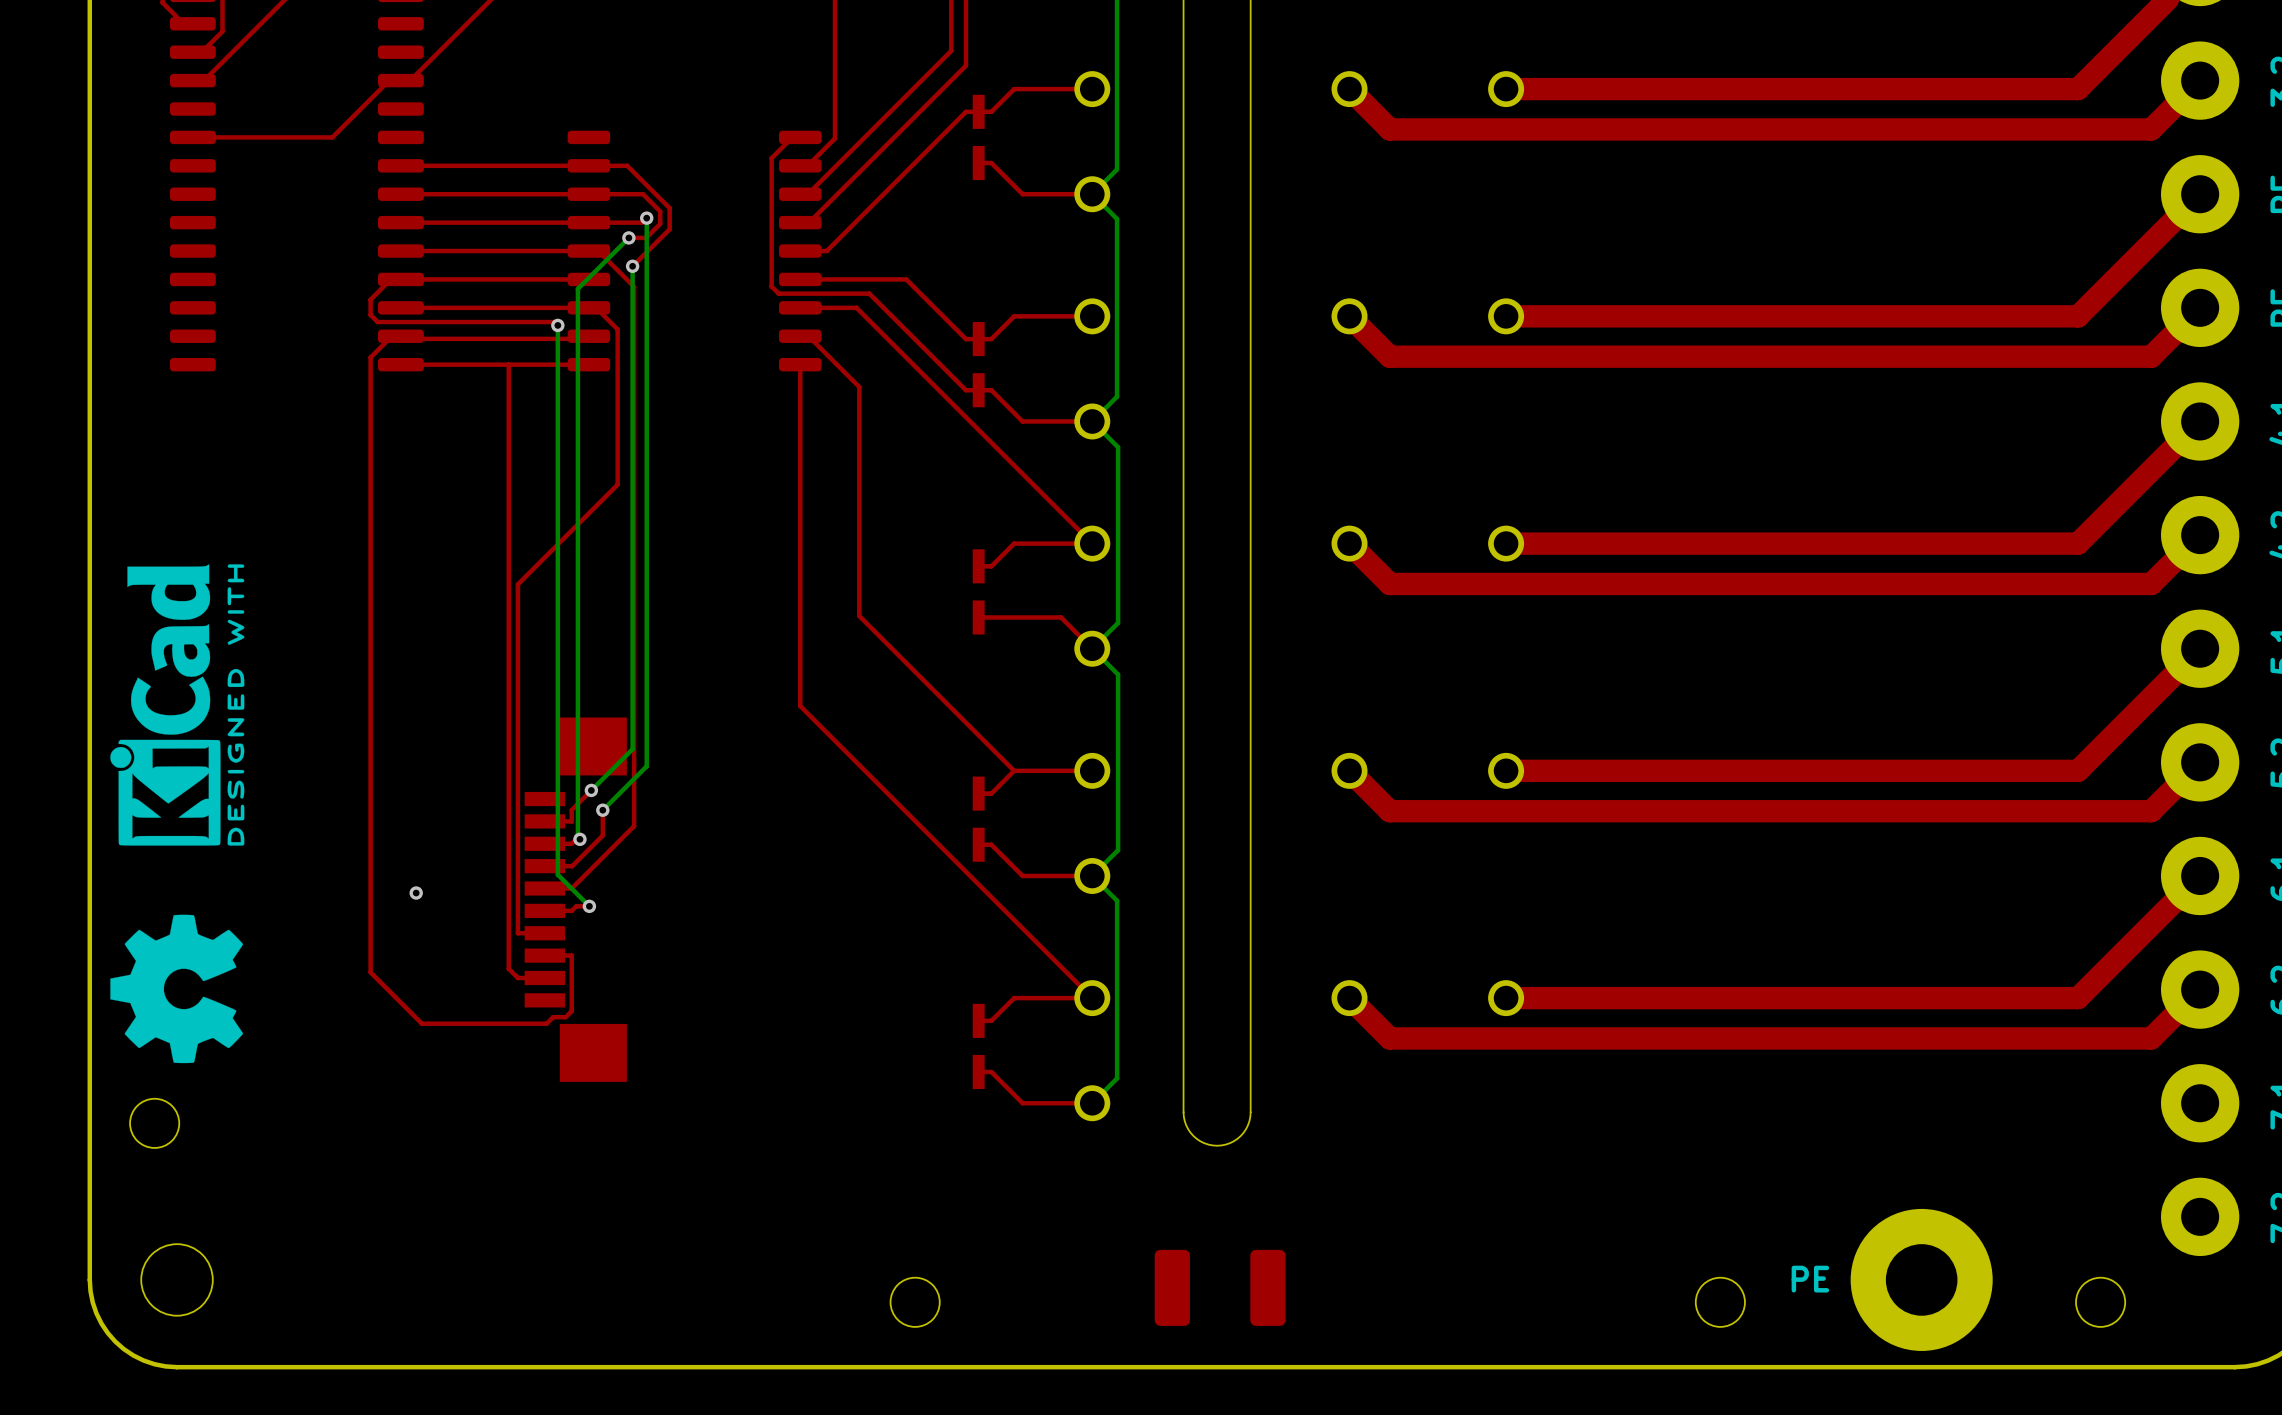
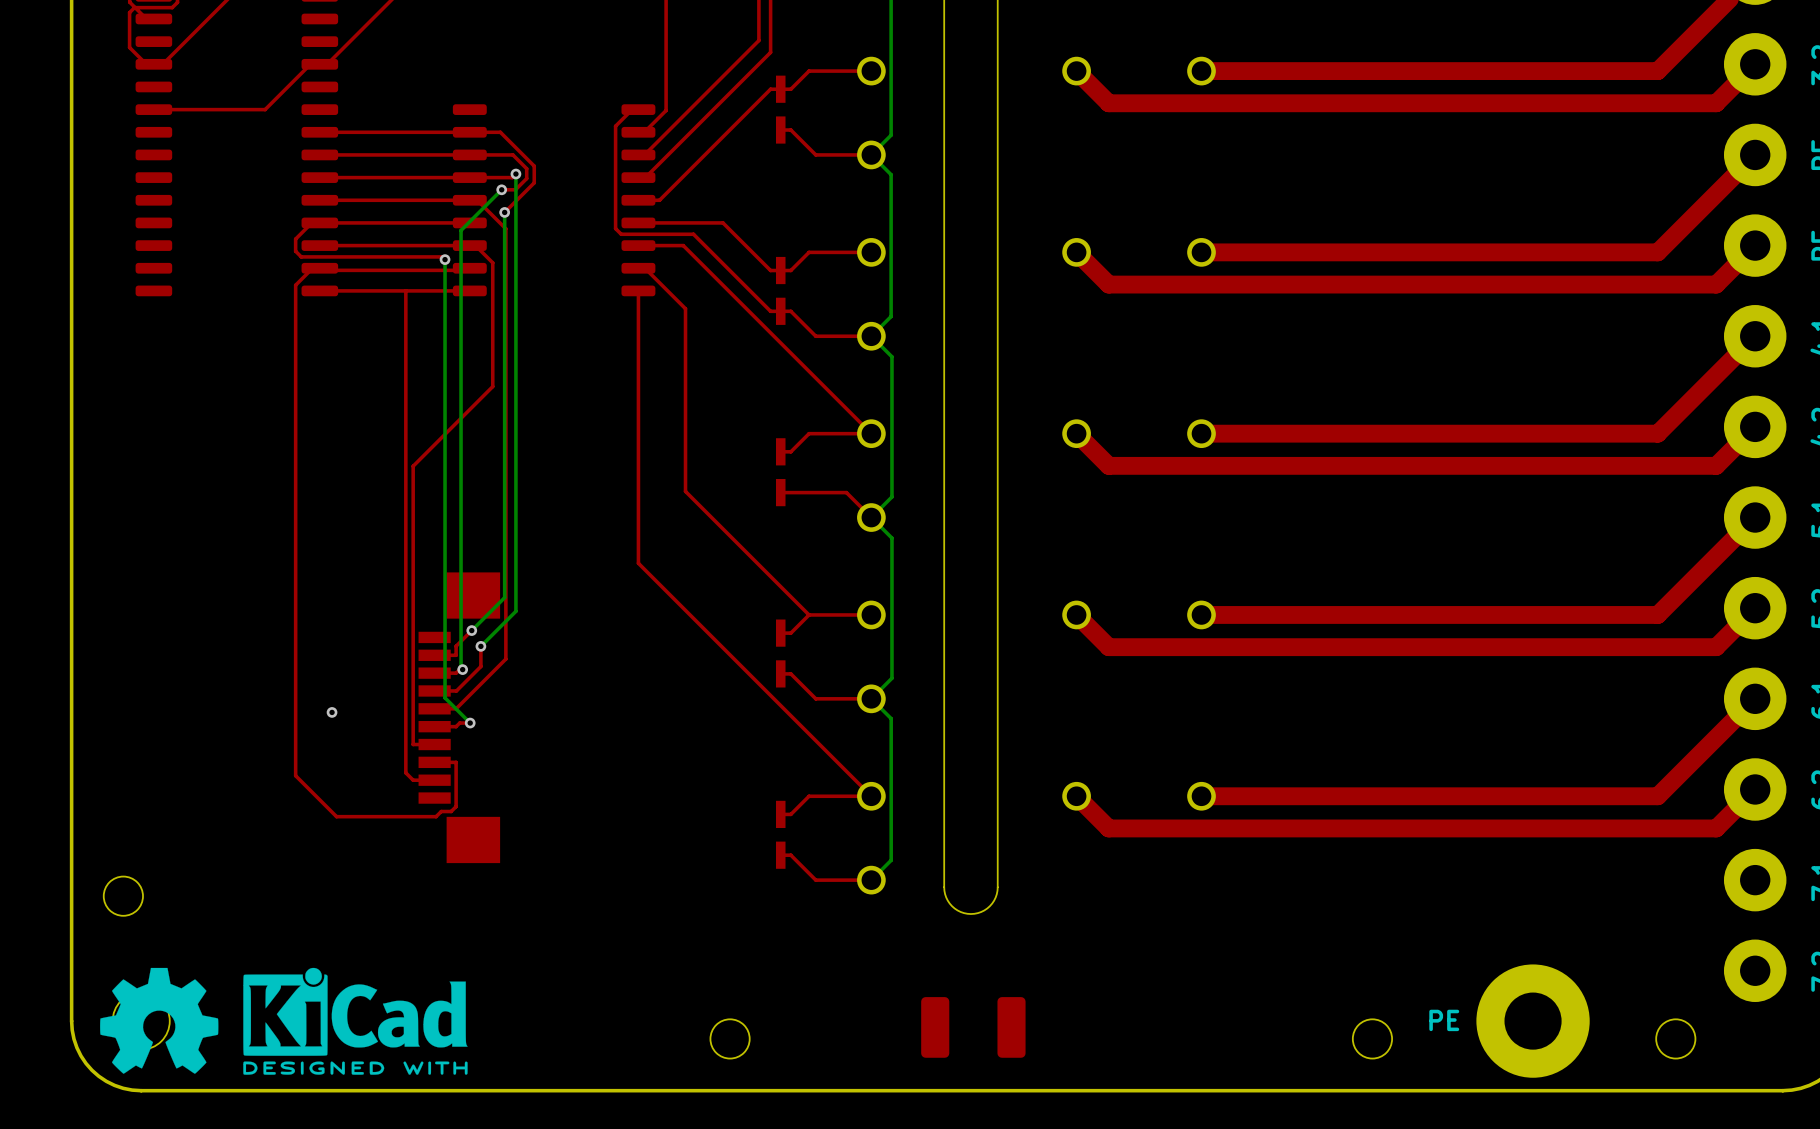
top track: (222, 3) (222, 31) (201, 52) -> (177, 2) (172, 7) (134, 7) (129, 12) (129, 47) (146, 64) (153, 64)
drawing: [110, 564, 245, 846] -> none
drawing: [110, 914, 244, 1064] -> none
drawing: none -> [100, 967, 219, 1074]
drawing: none -> [243, 967, 468, 1075]

